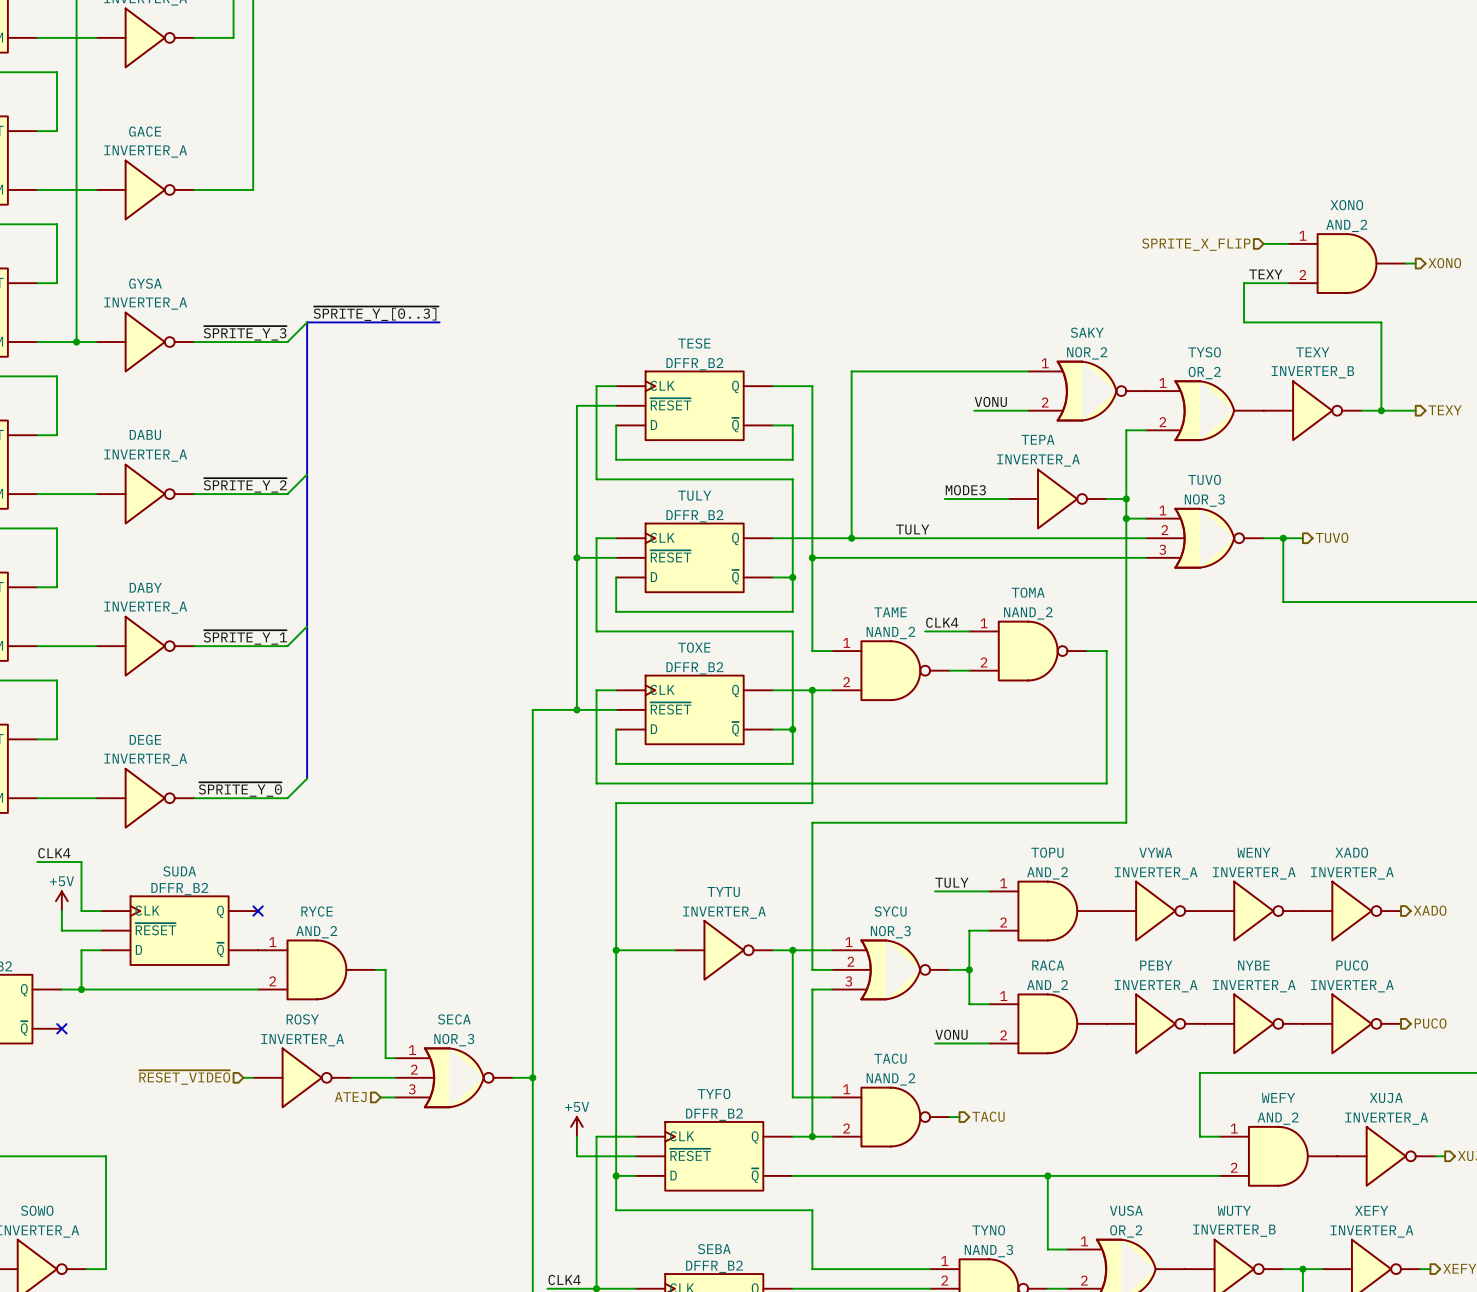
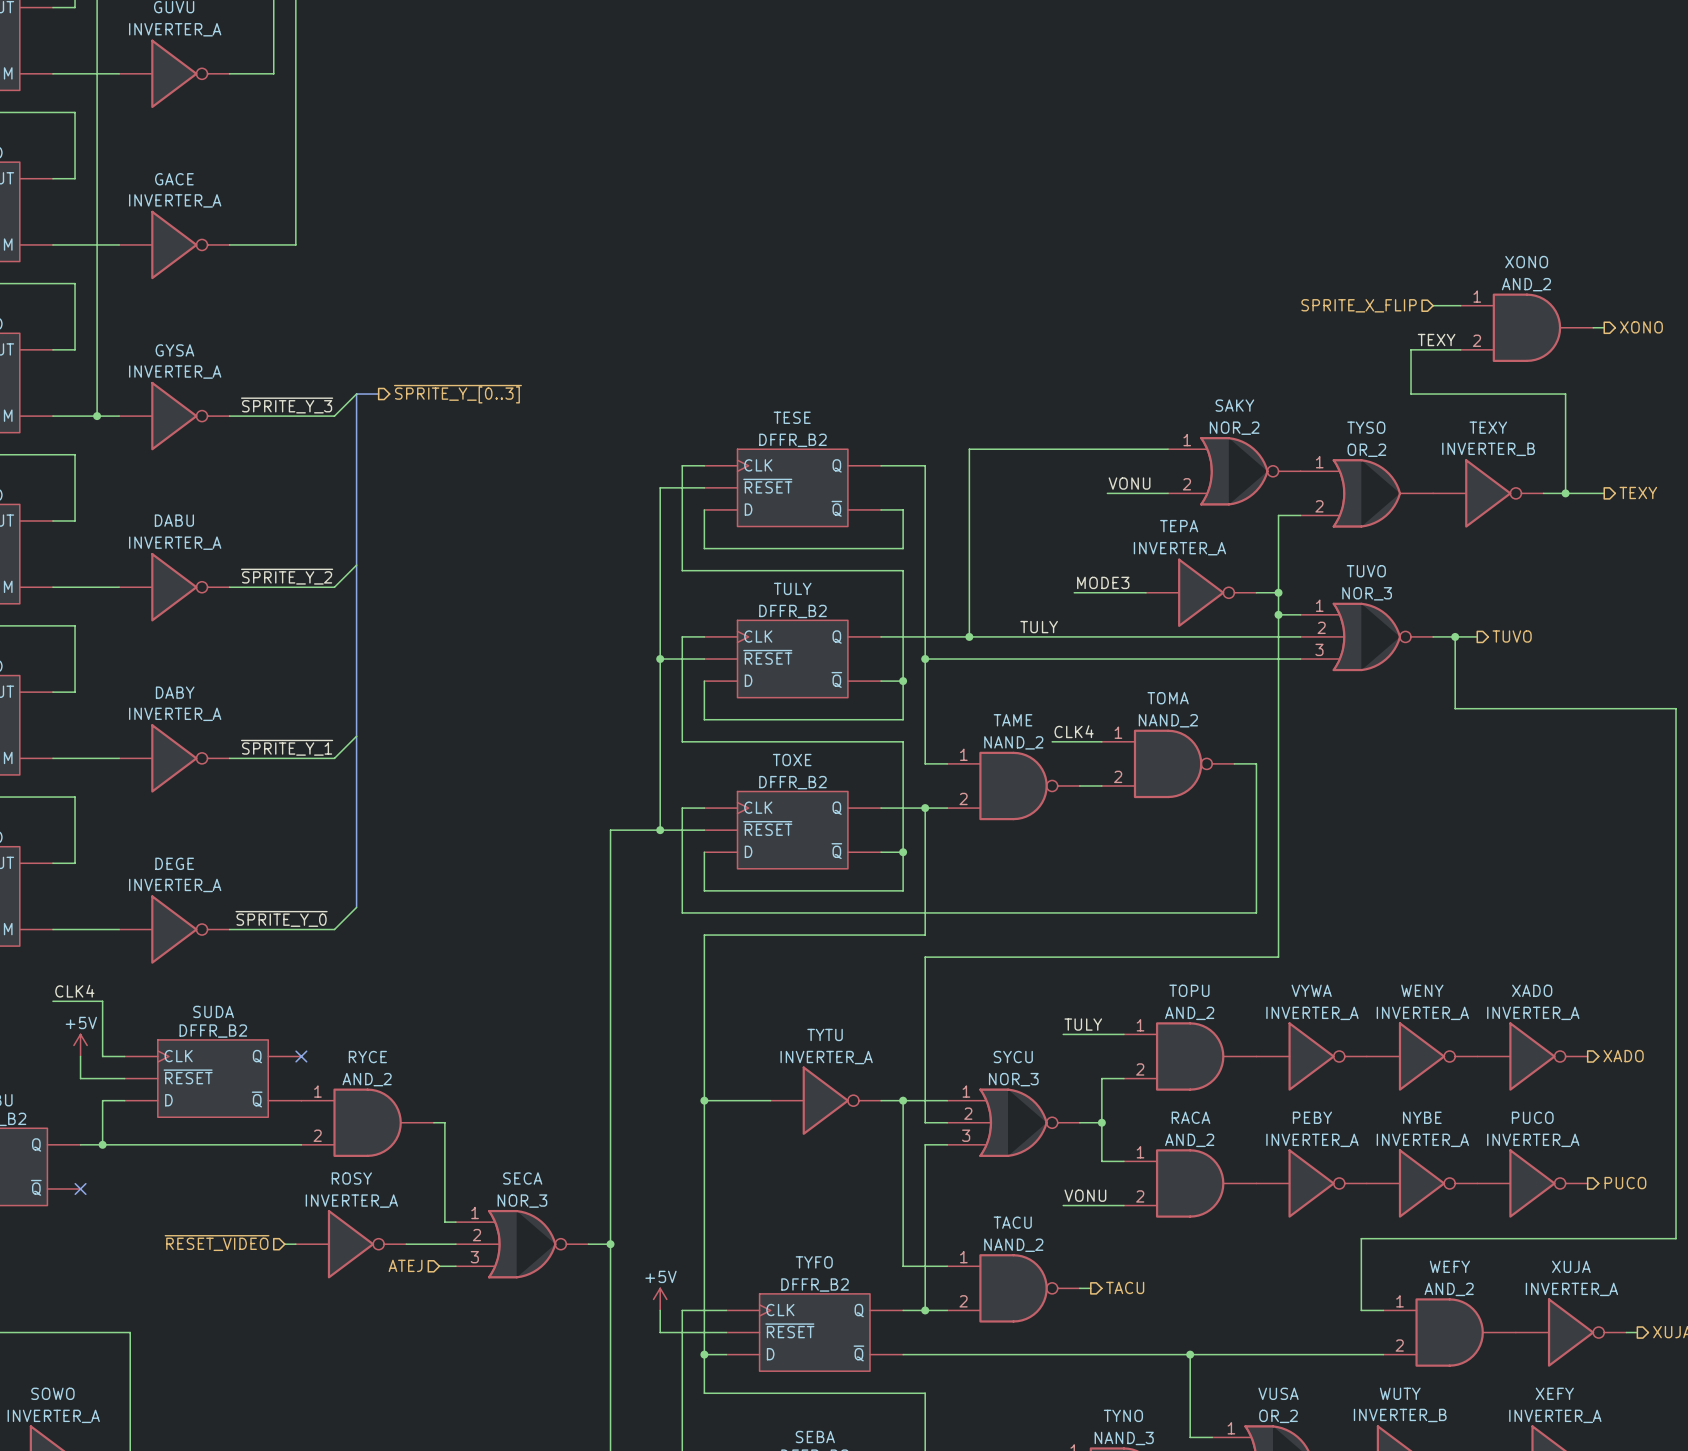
label: ~{SPRITE_Y_[0..3]} (376, 313) -> none
bus: (326, 322) (439, 322) -> none
hierarchical label: none -> ~{SPRITE_Y_[0..3]} (457, 394)

